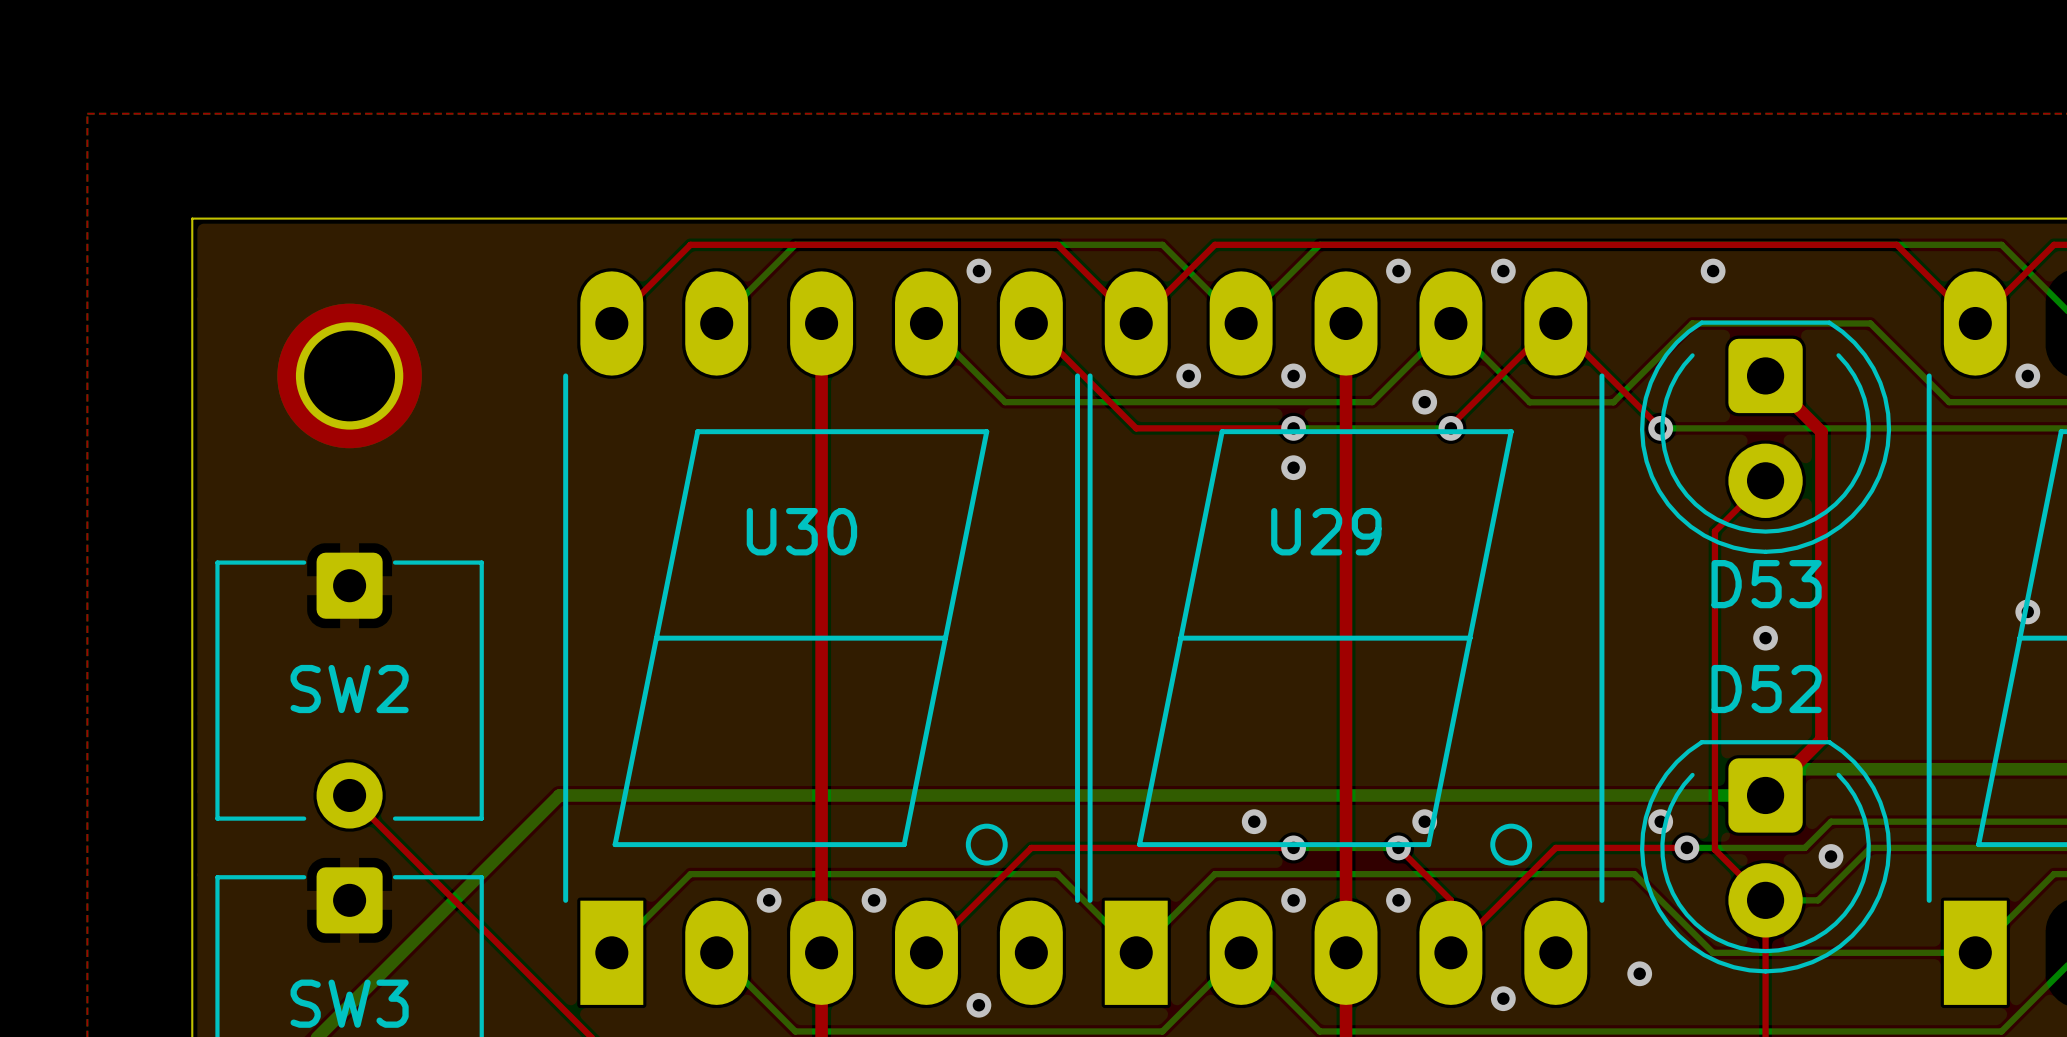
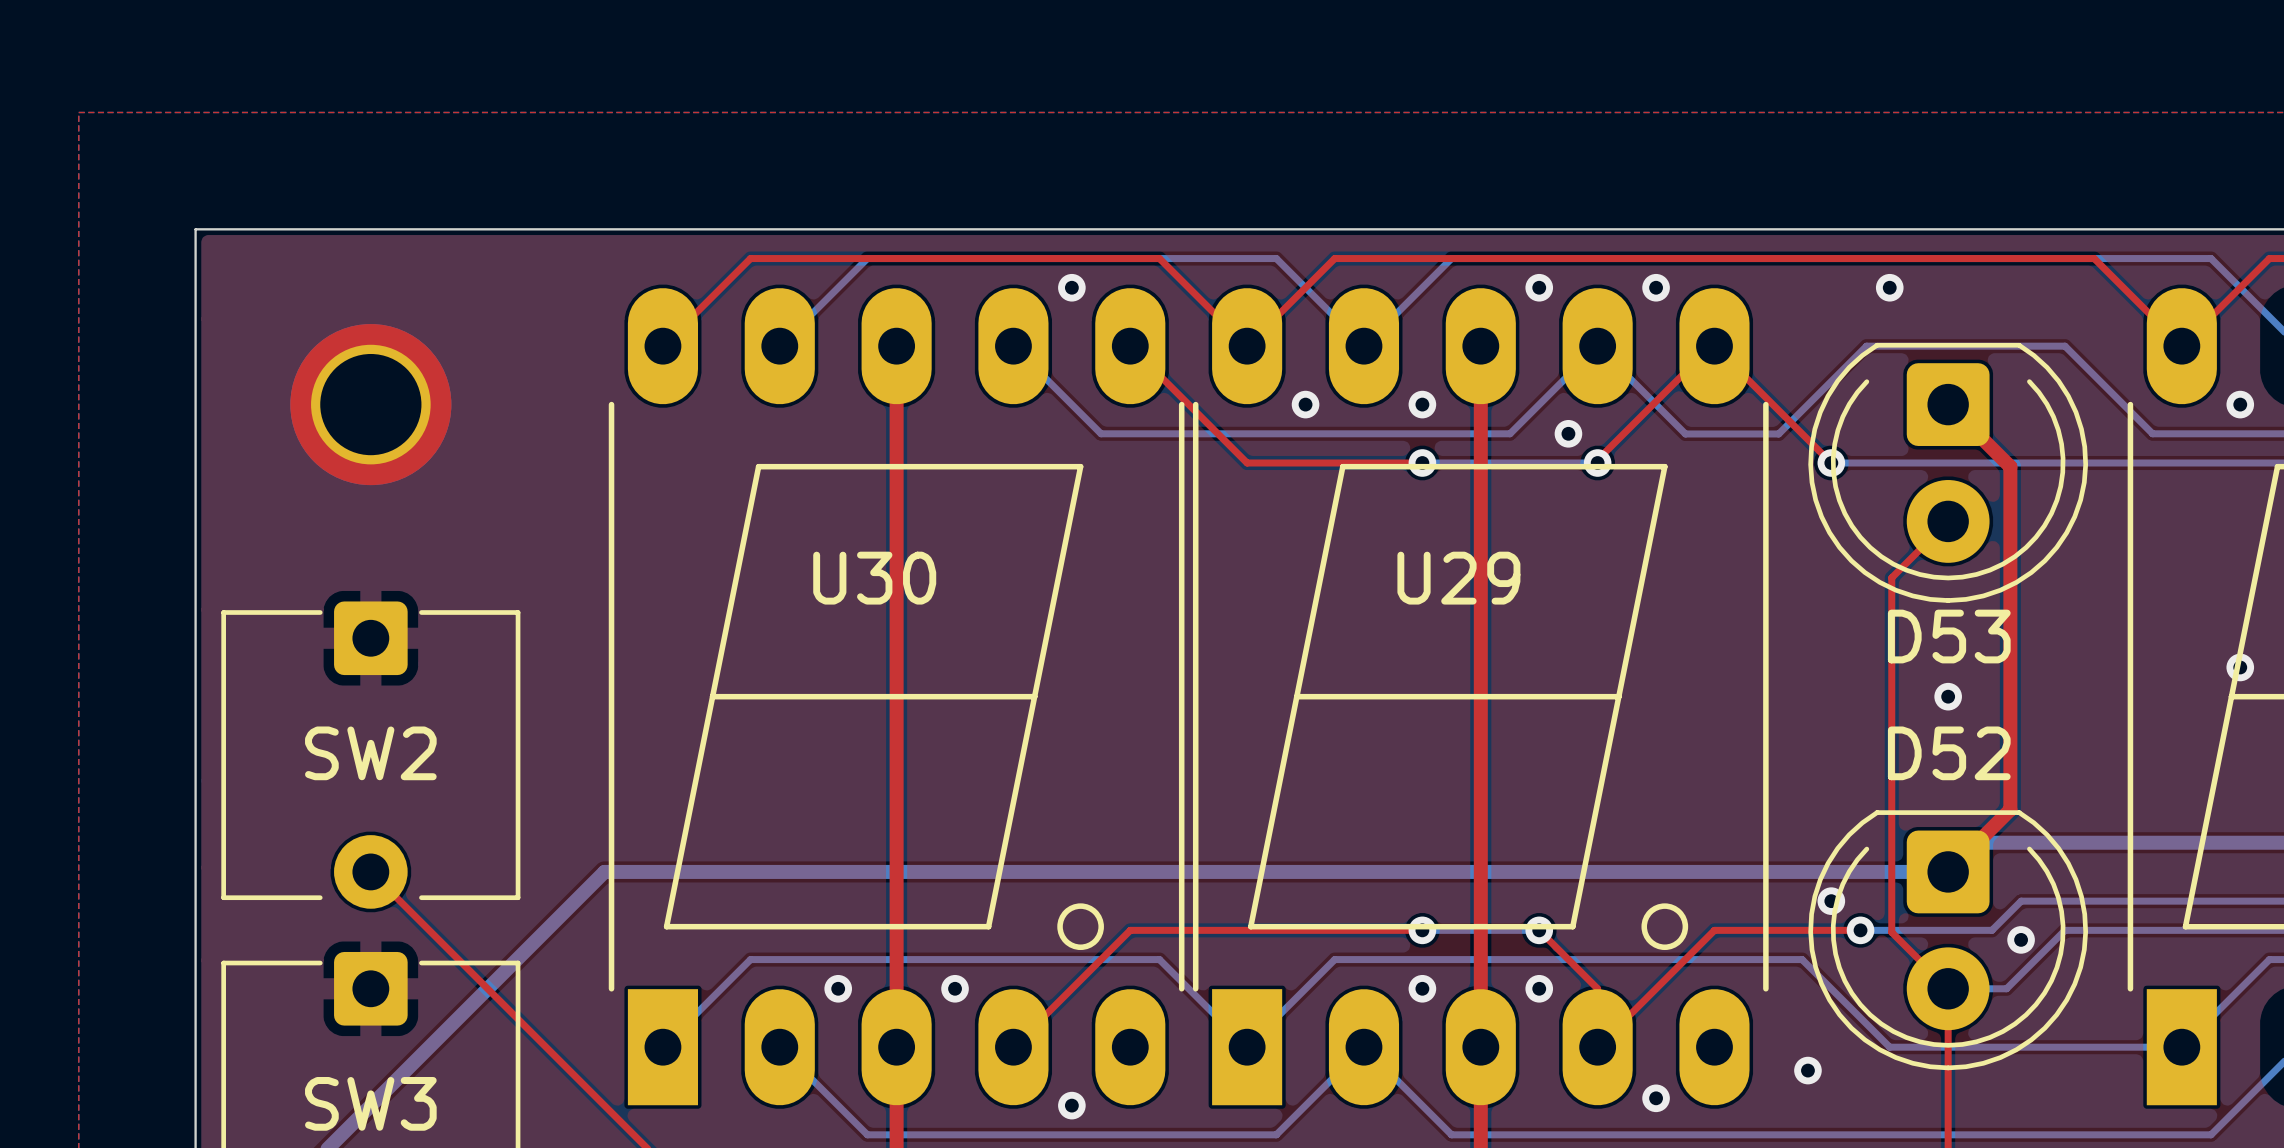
via: (1293, 467) -> none
via: (1254, 821) -> none
via: (1424, 821) -> none

